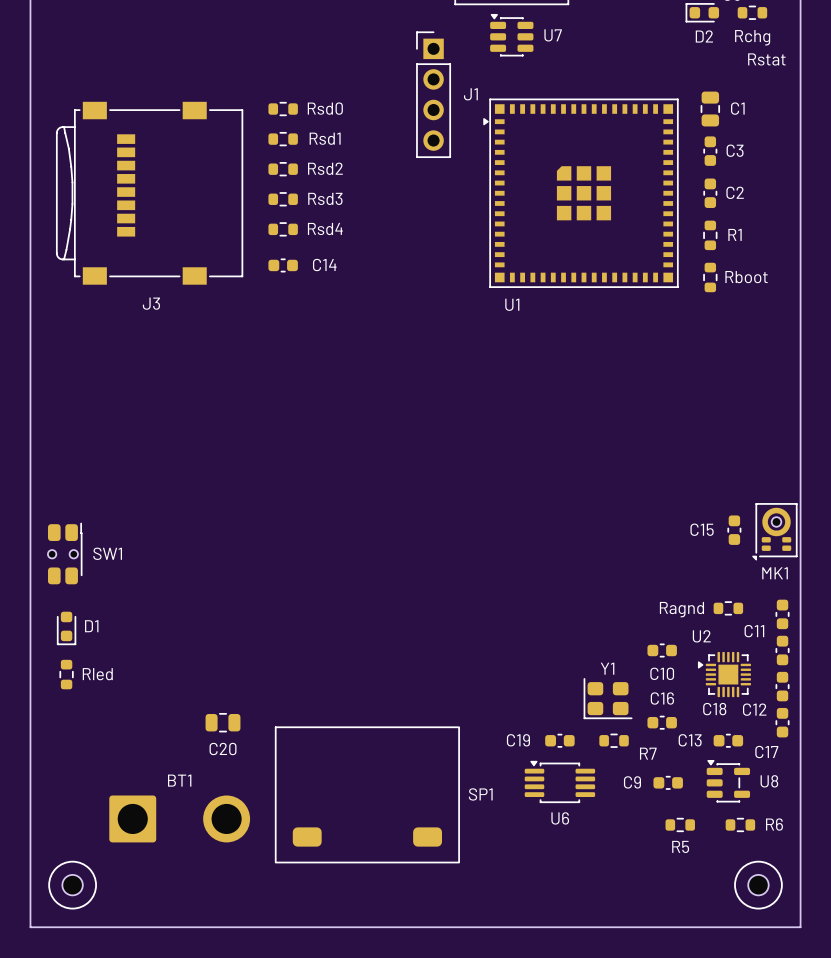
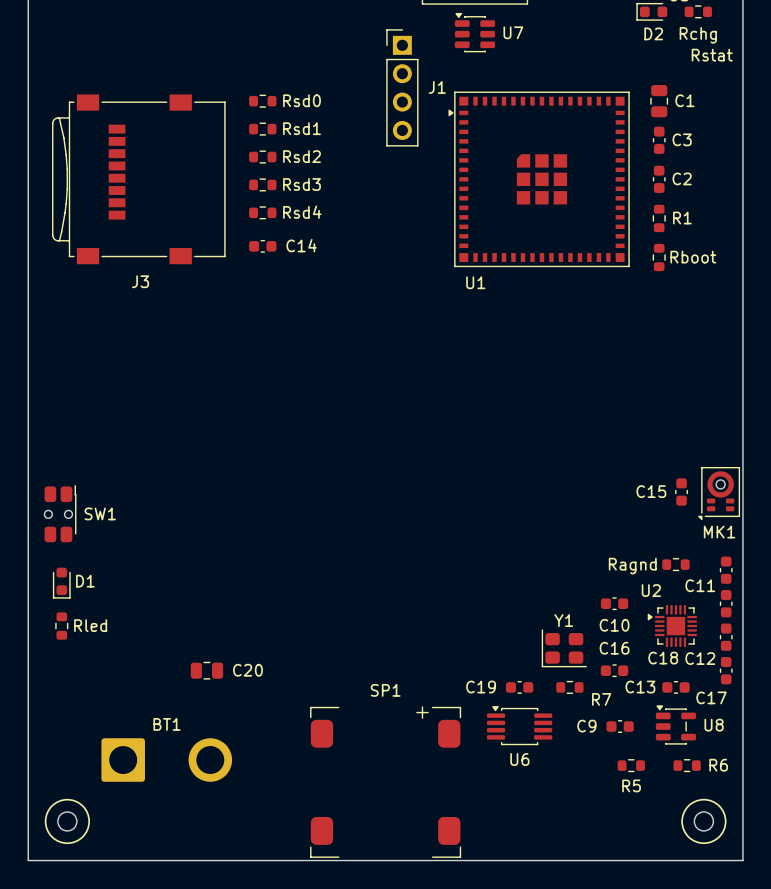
SP1 footprint: [274, 726, 460, 864] -> [310, 706, 462, 858]
C20 name position: C20 (223, 749) -> C20 (247, 670)
SP1 name position: SP1 (480, 794) -> SP1 (385, 690)

